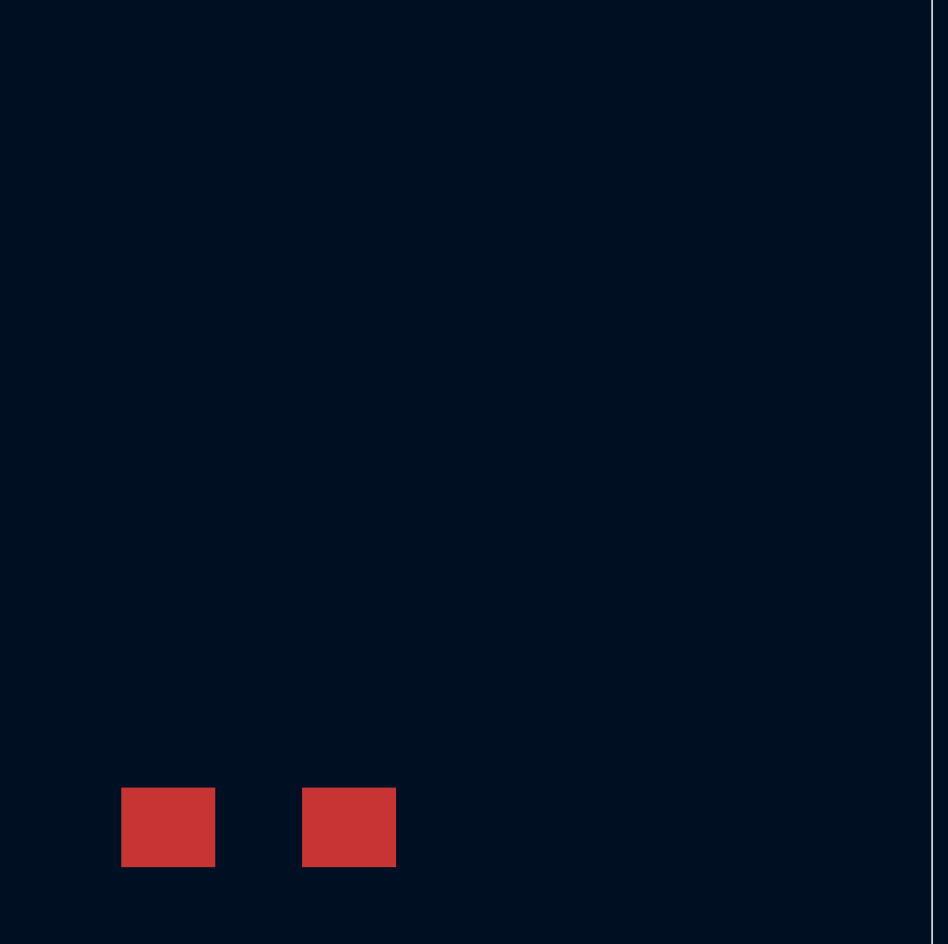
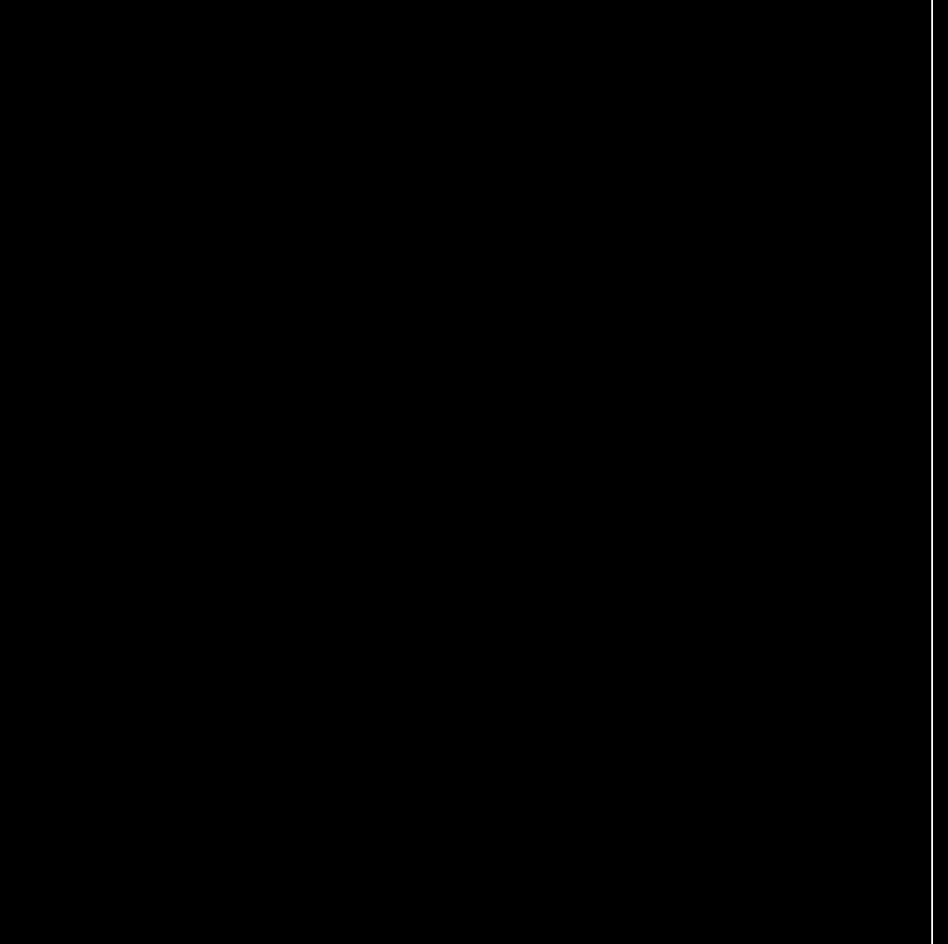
part: (258, 827) -> none

